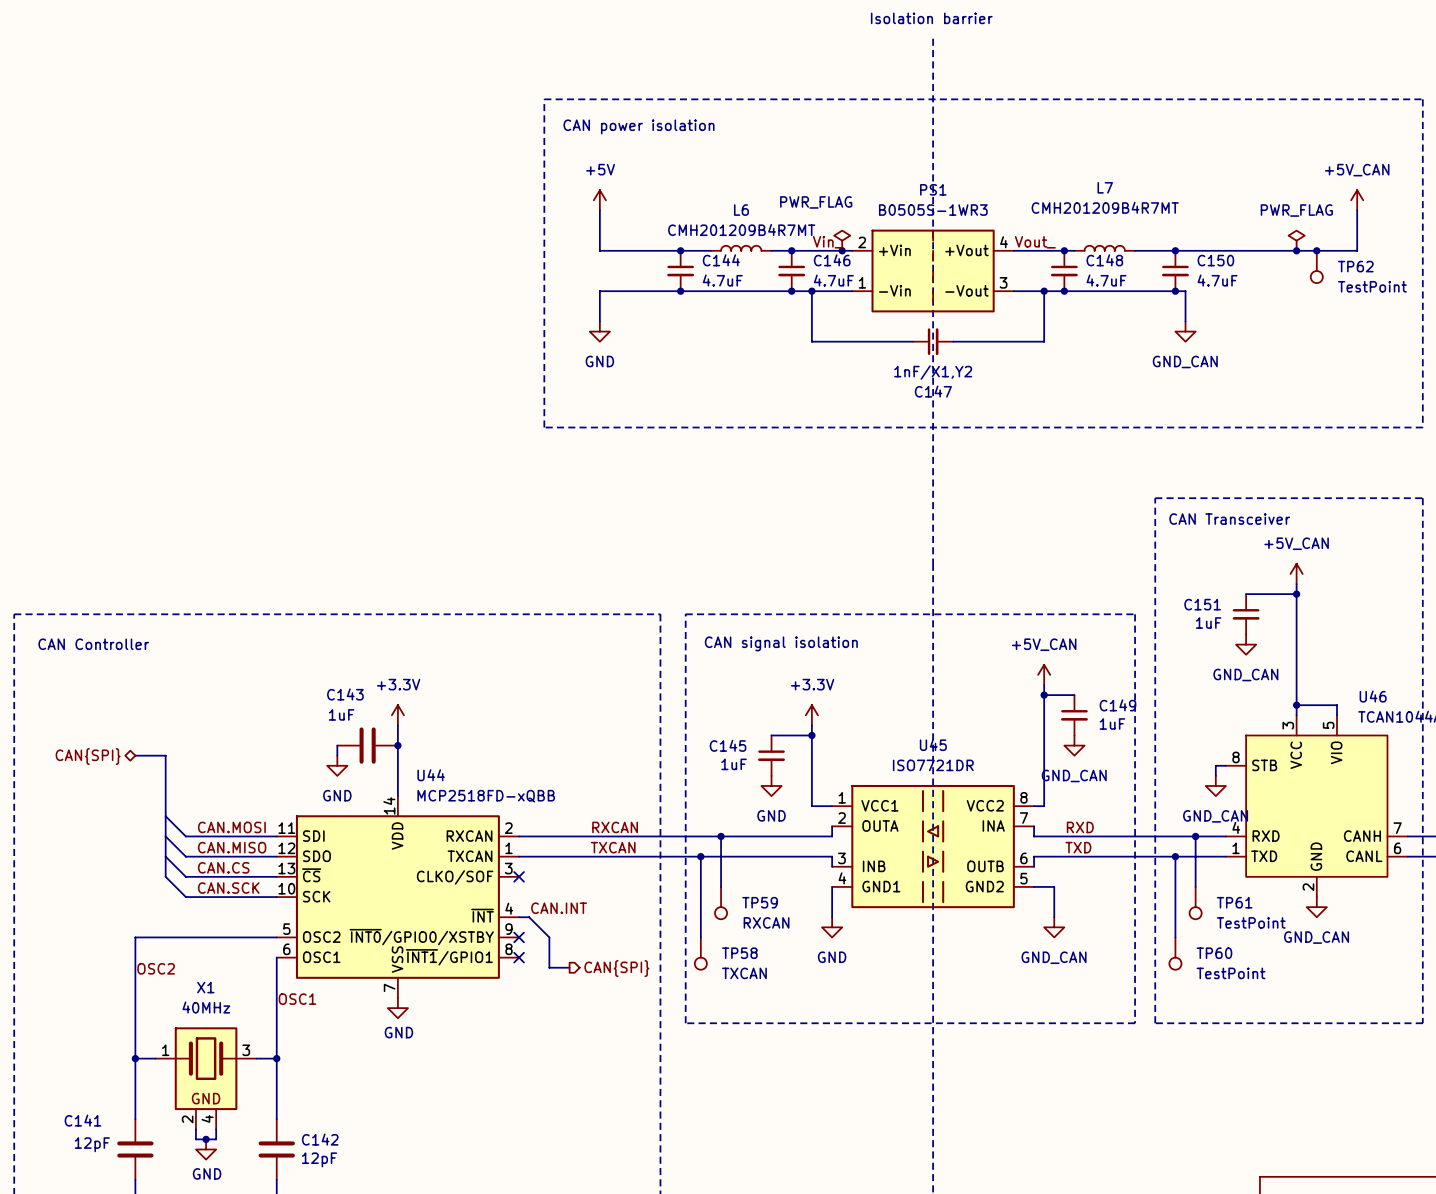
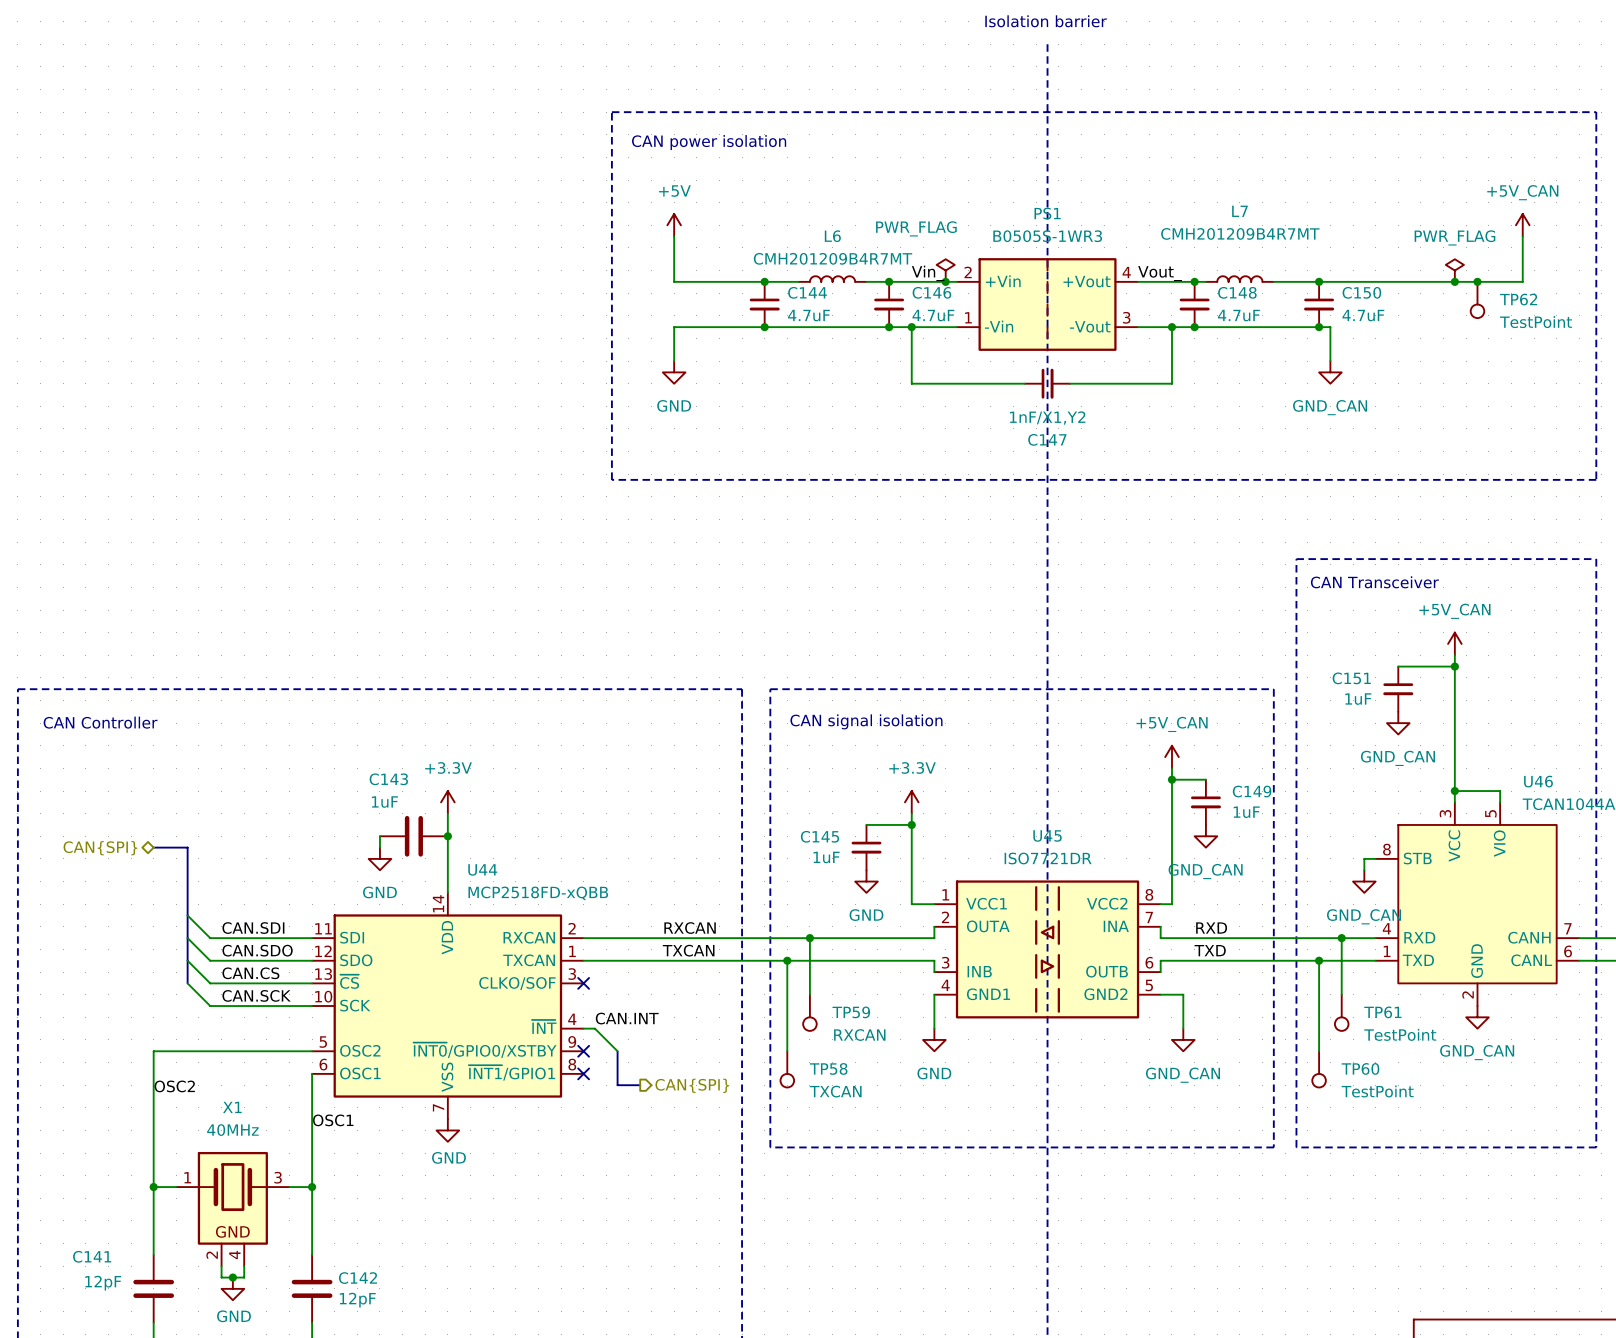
label: CAN.MOSI (231, 827) -> CAN.SDI (253, 928)
label: CAN.MISO (232, 847) -> CAN.SDO (257, 950)

